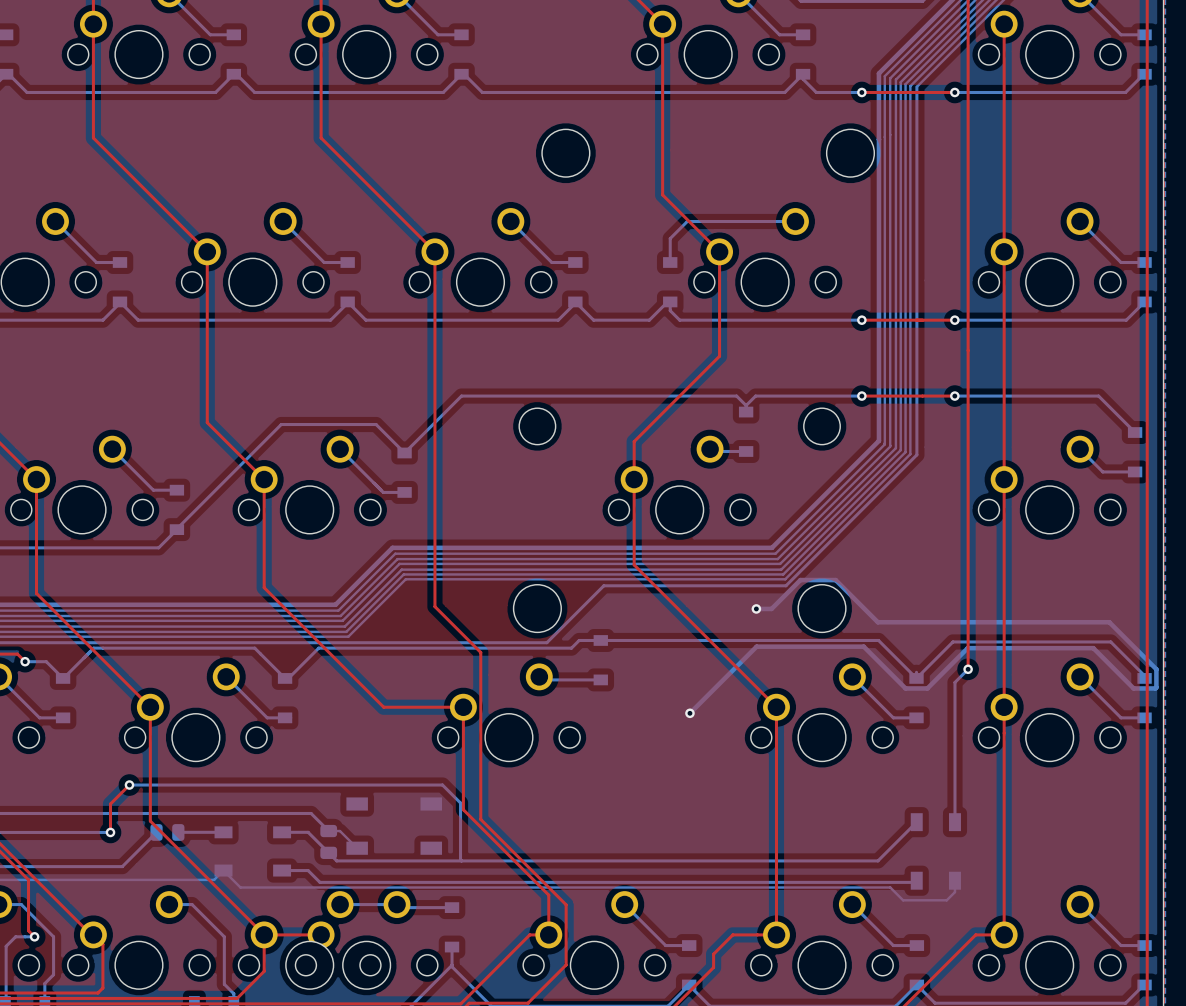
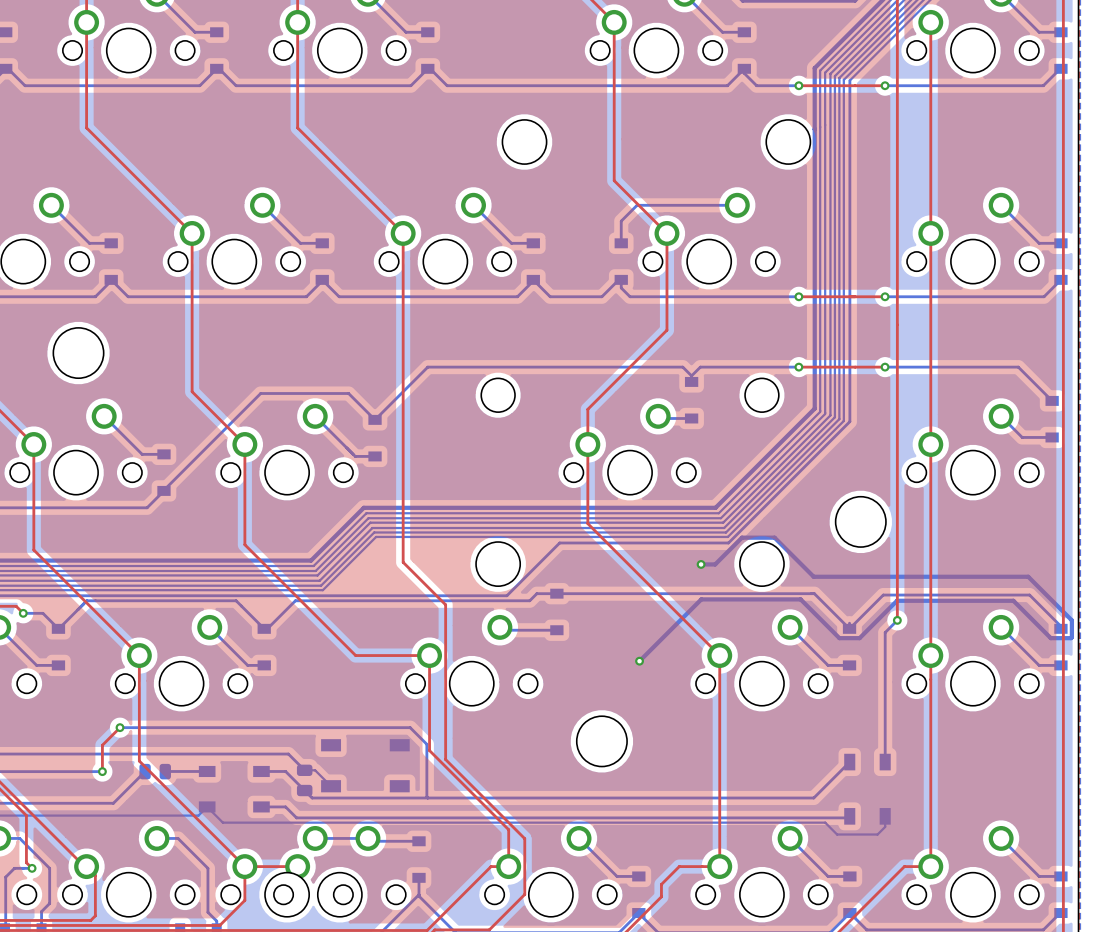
round board edge: none -> [53, 327, 104, 379]
round board edge: none -> [835, 496, 887, 548]
round board edge: none -> [576, 715, 628, 767]

